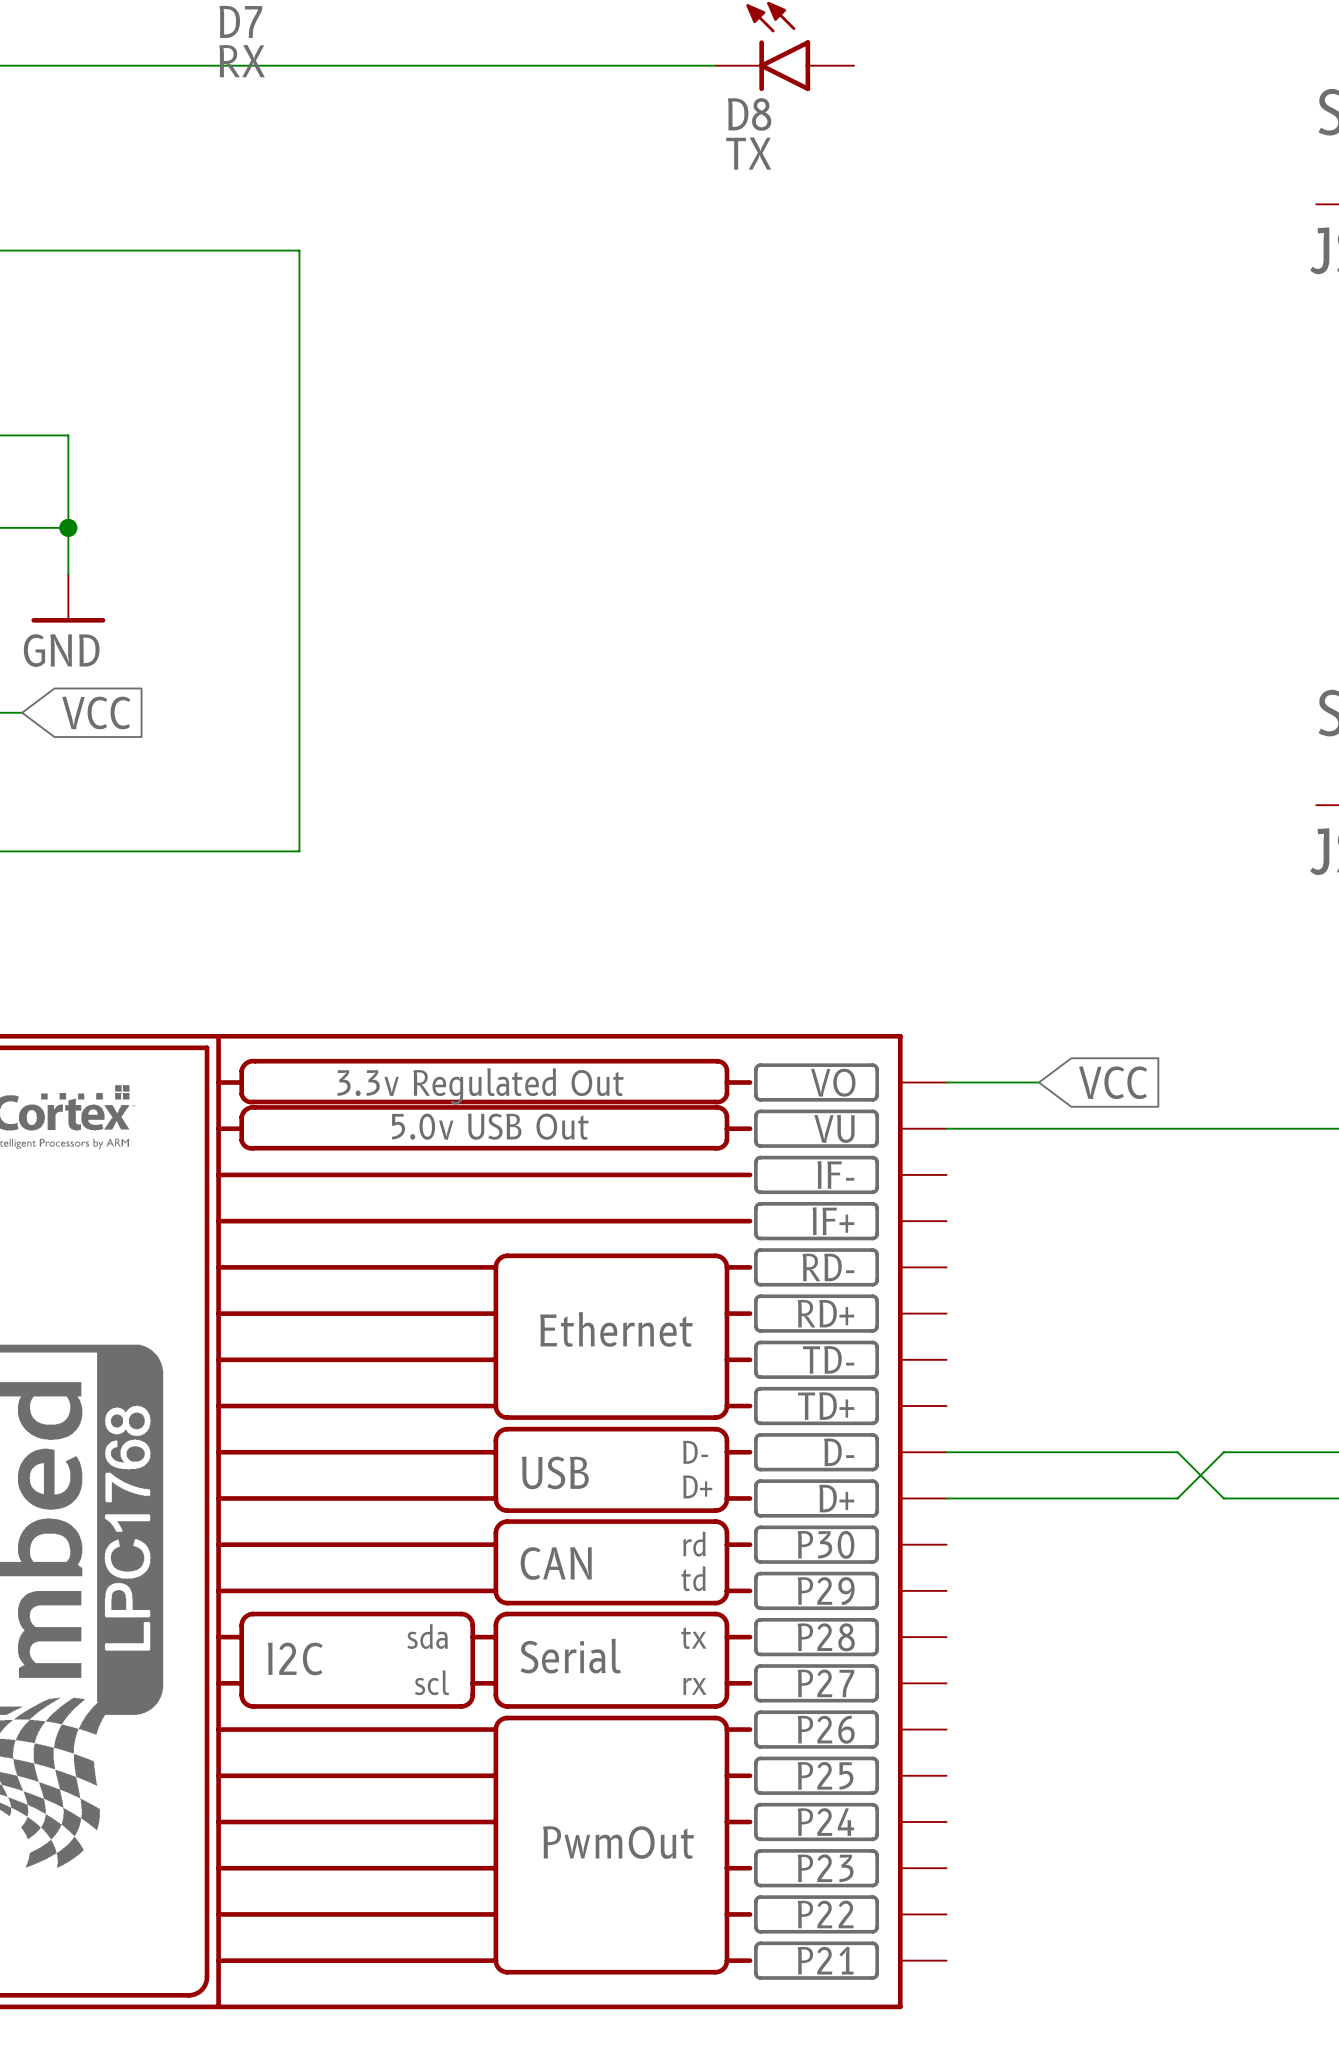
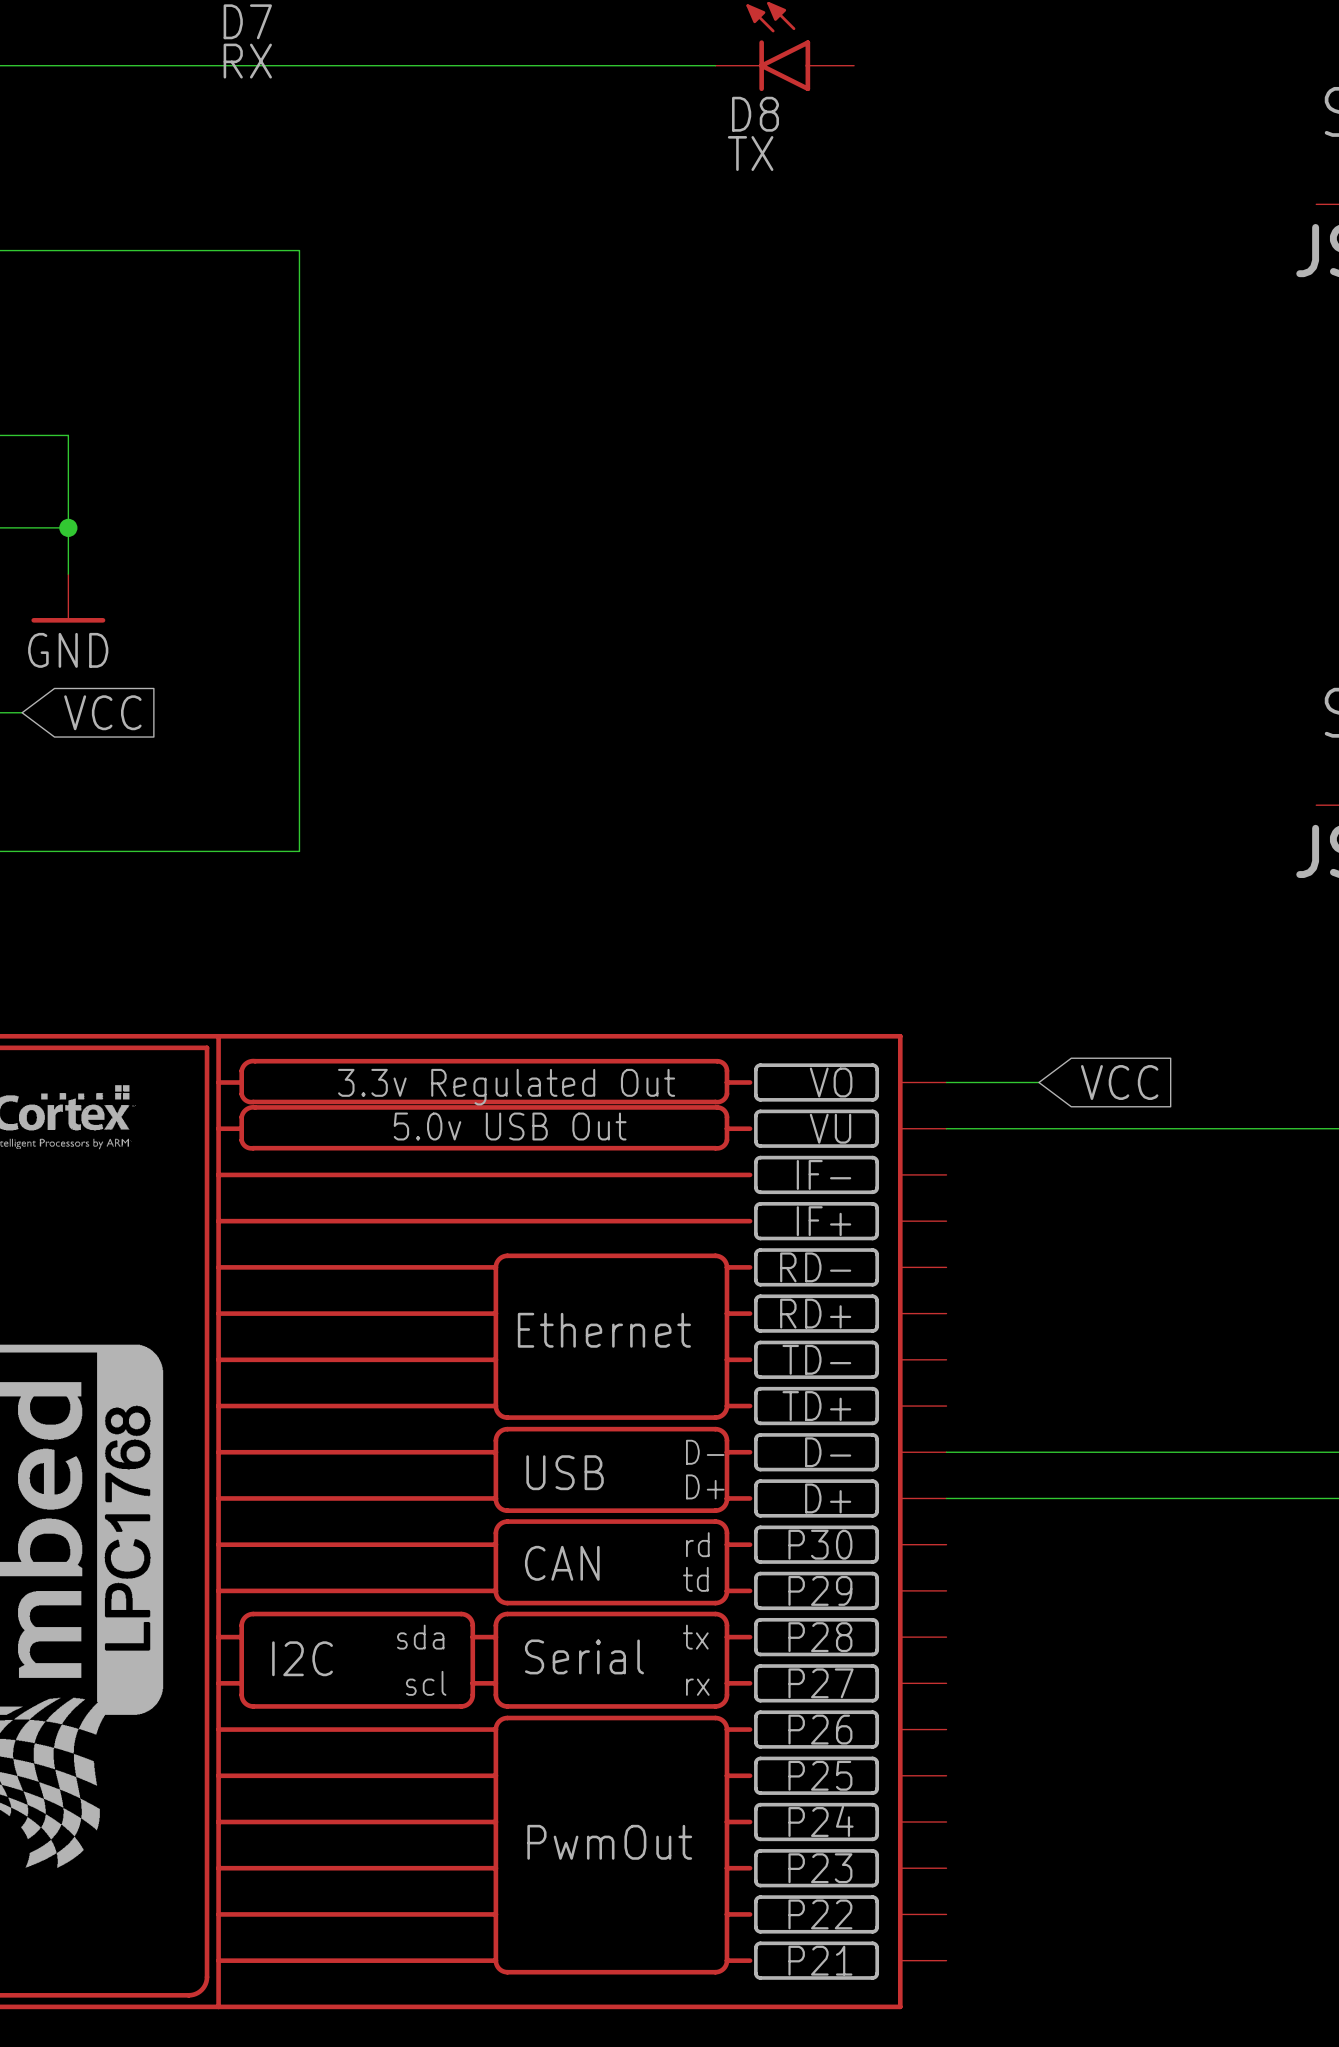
wire: (1177, 1452) (1223, 1498) -> (1177, 1452) (1223, 1452)
wire: (1223, 1452) (1177, 1498) -> (1223, 1498) (1177, 1498)

